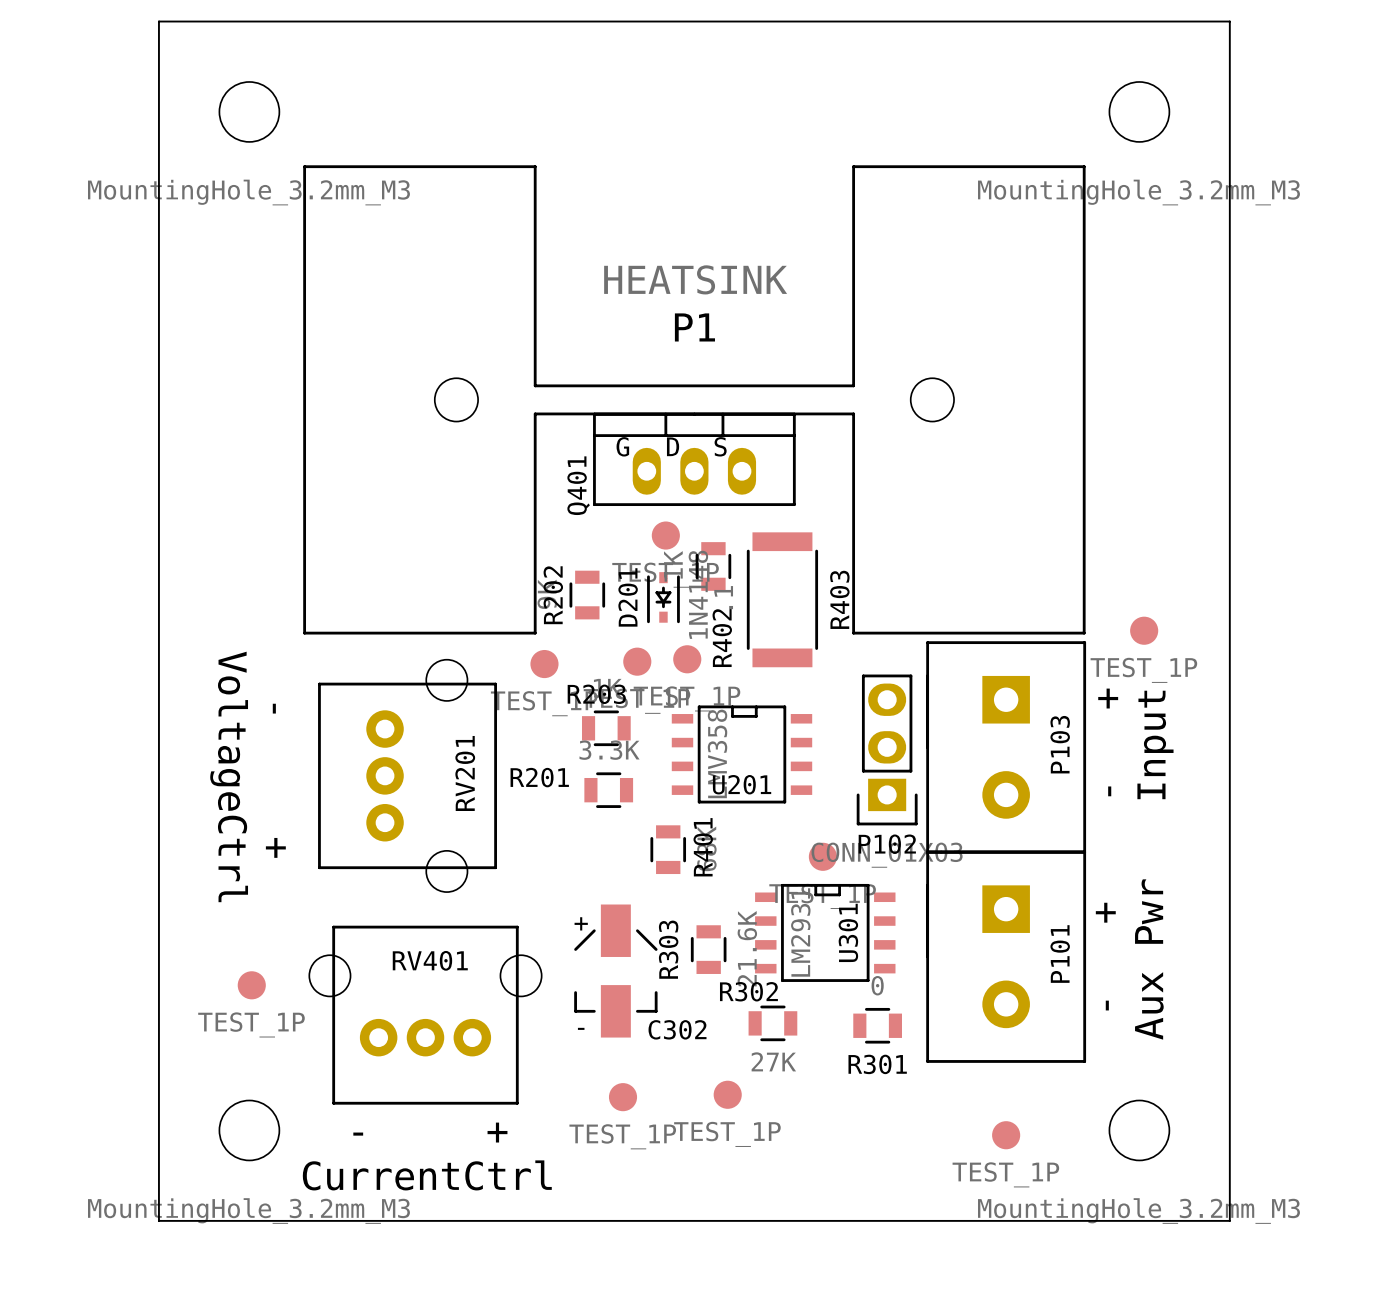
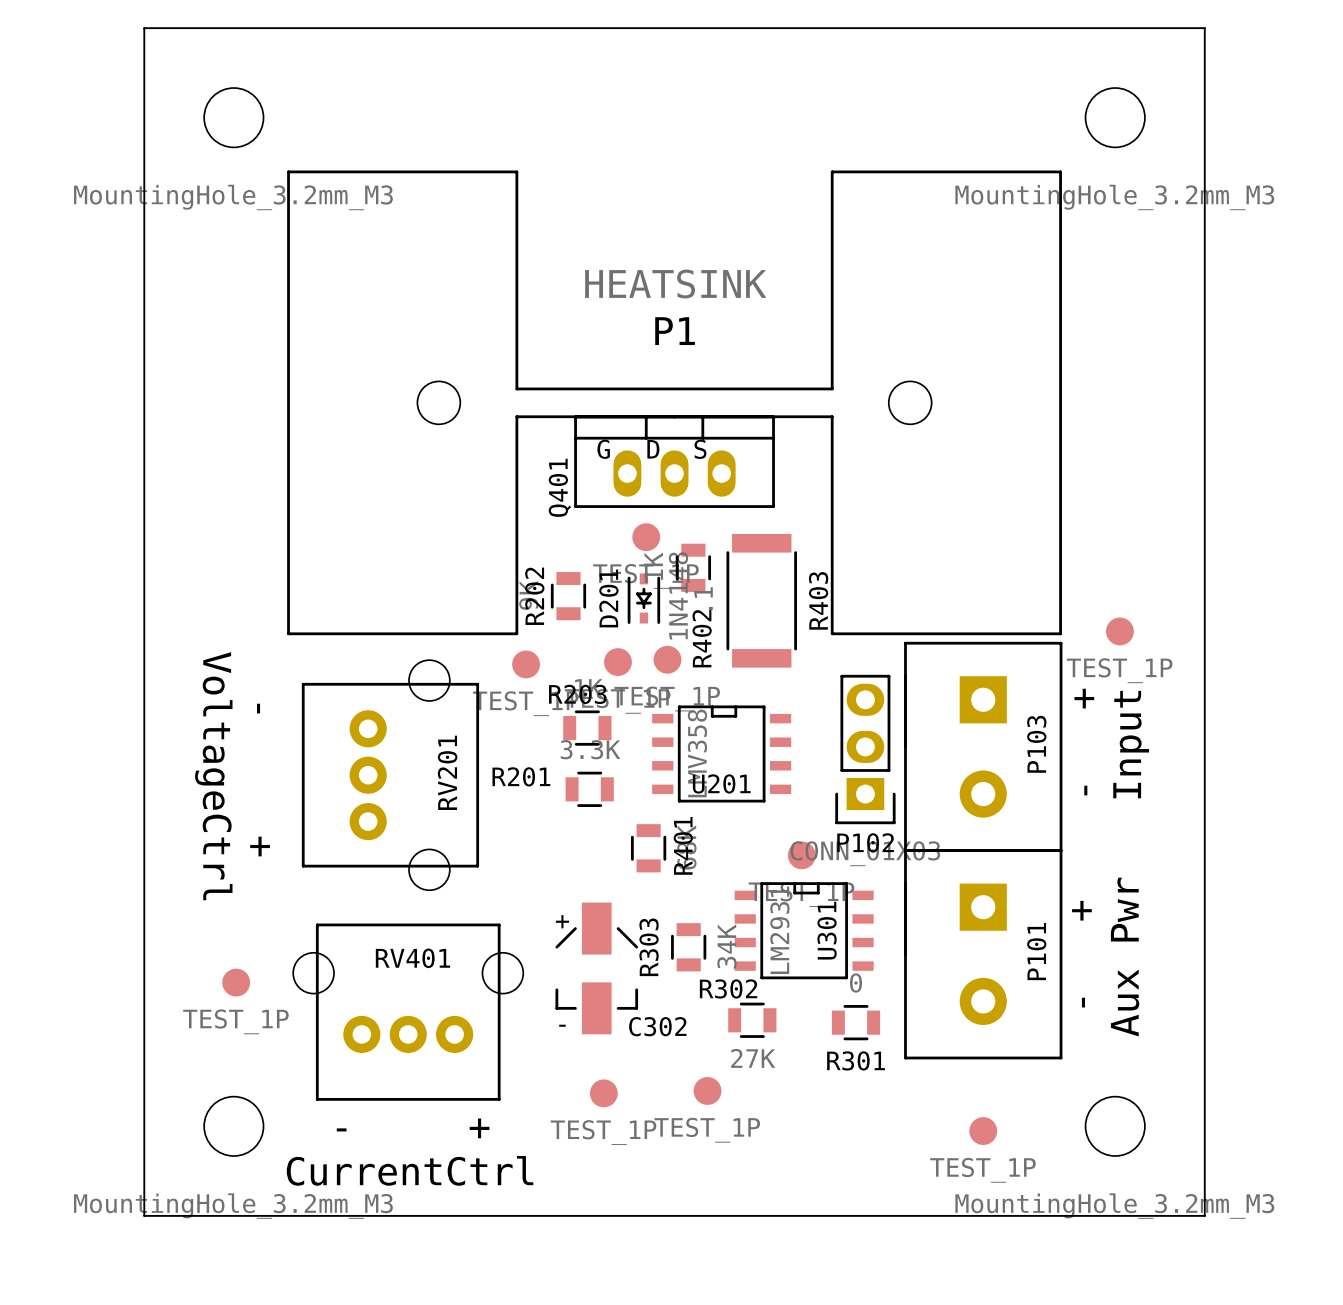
R303 value: 21.6K (747, 948) -> 34K (726, 946)

